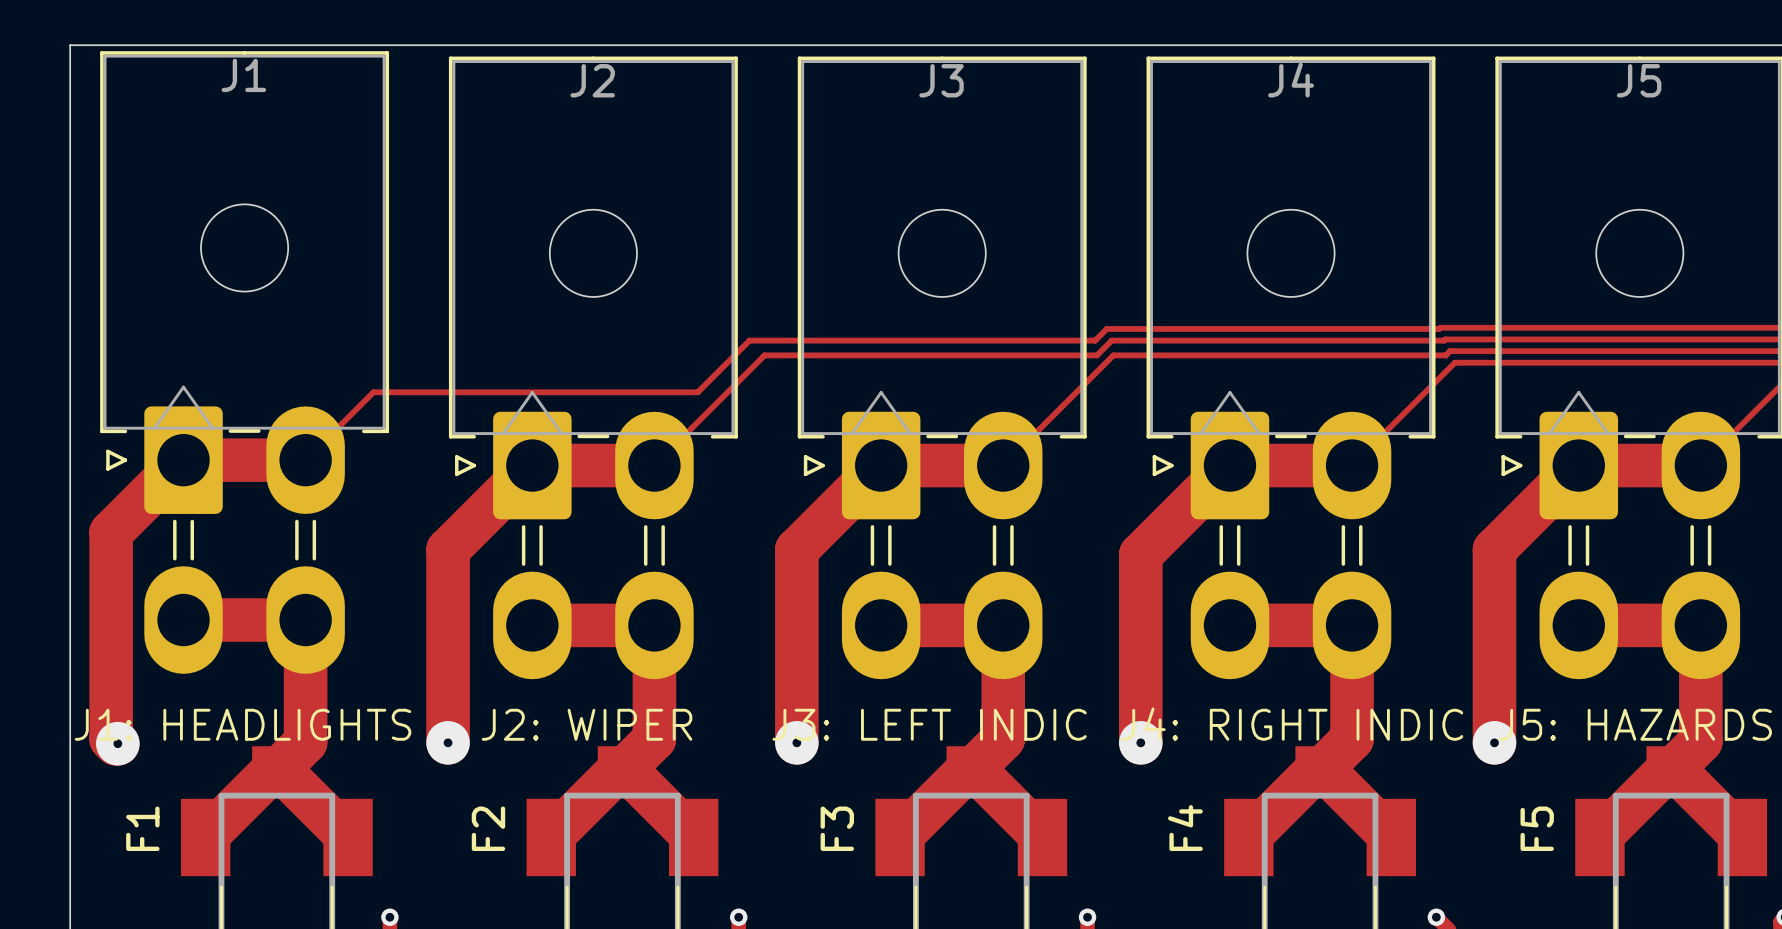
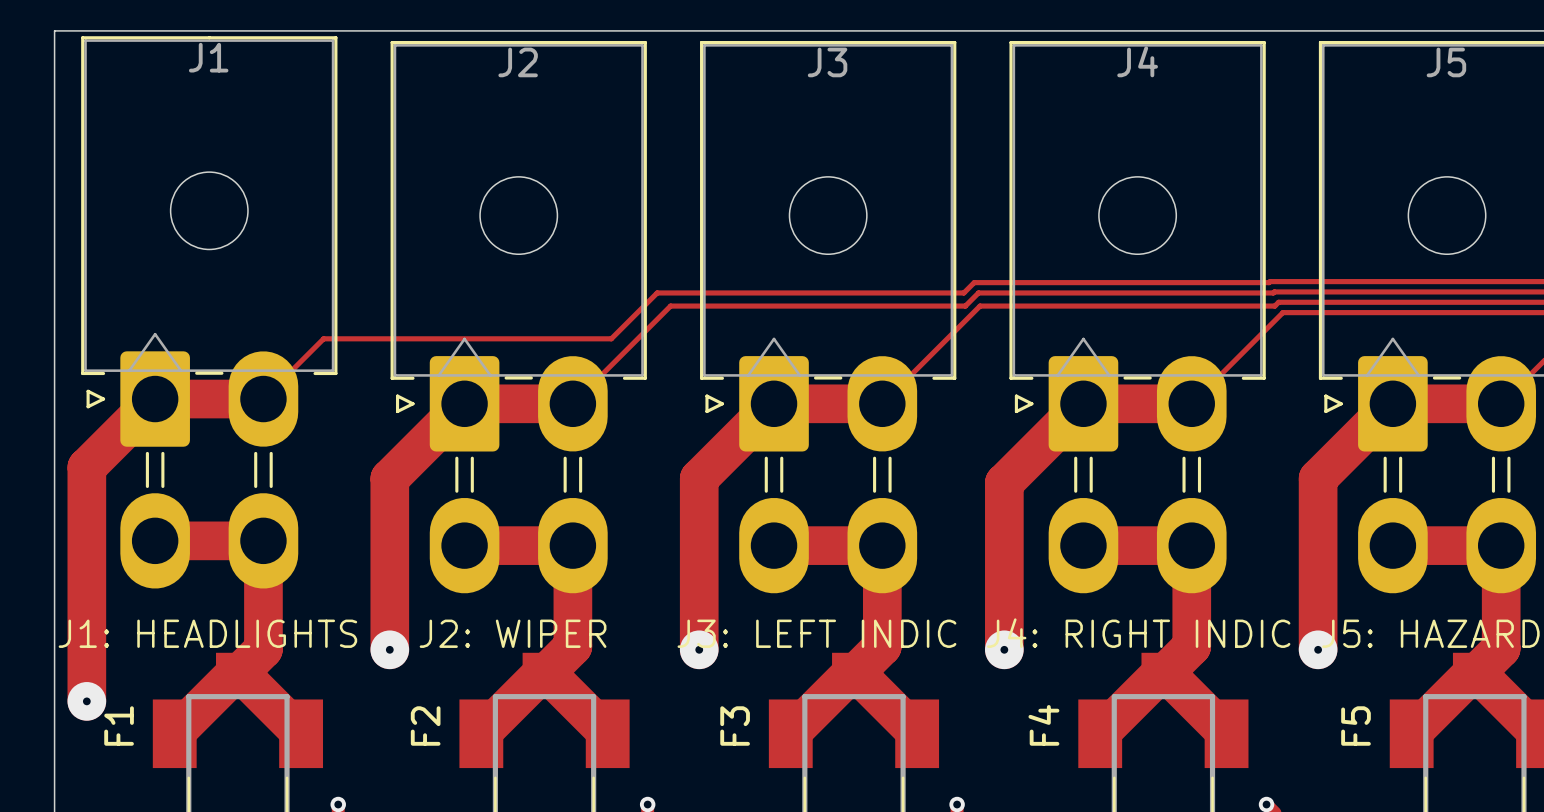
track: (111, 532) (111, 739) (117, 743) -> (90, 463) (86, 467) (86, 701)
via position: (117, 743) -> (86, 701)

